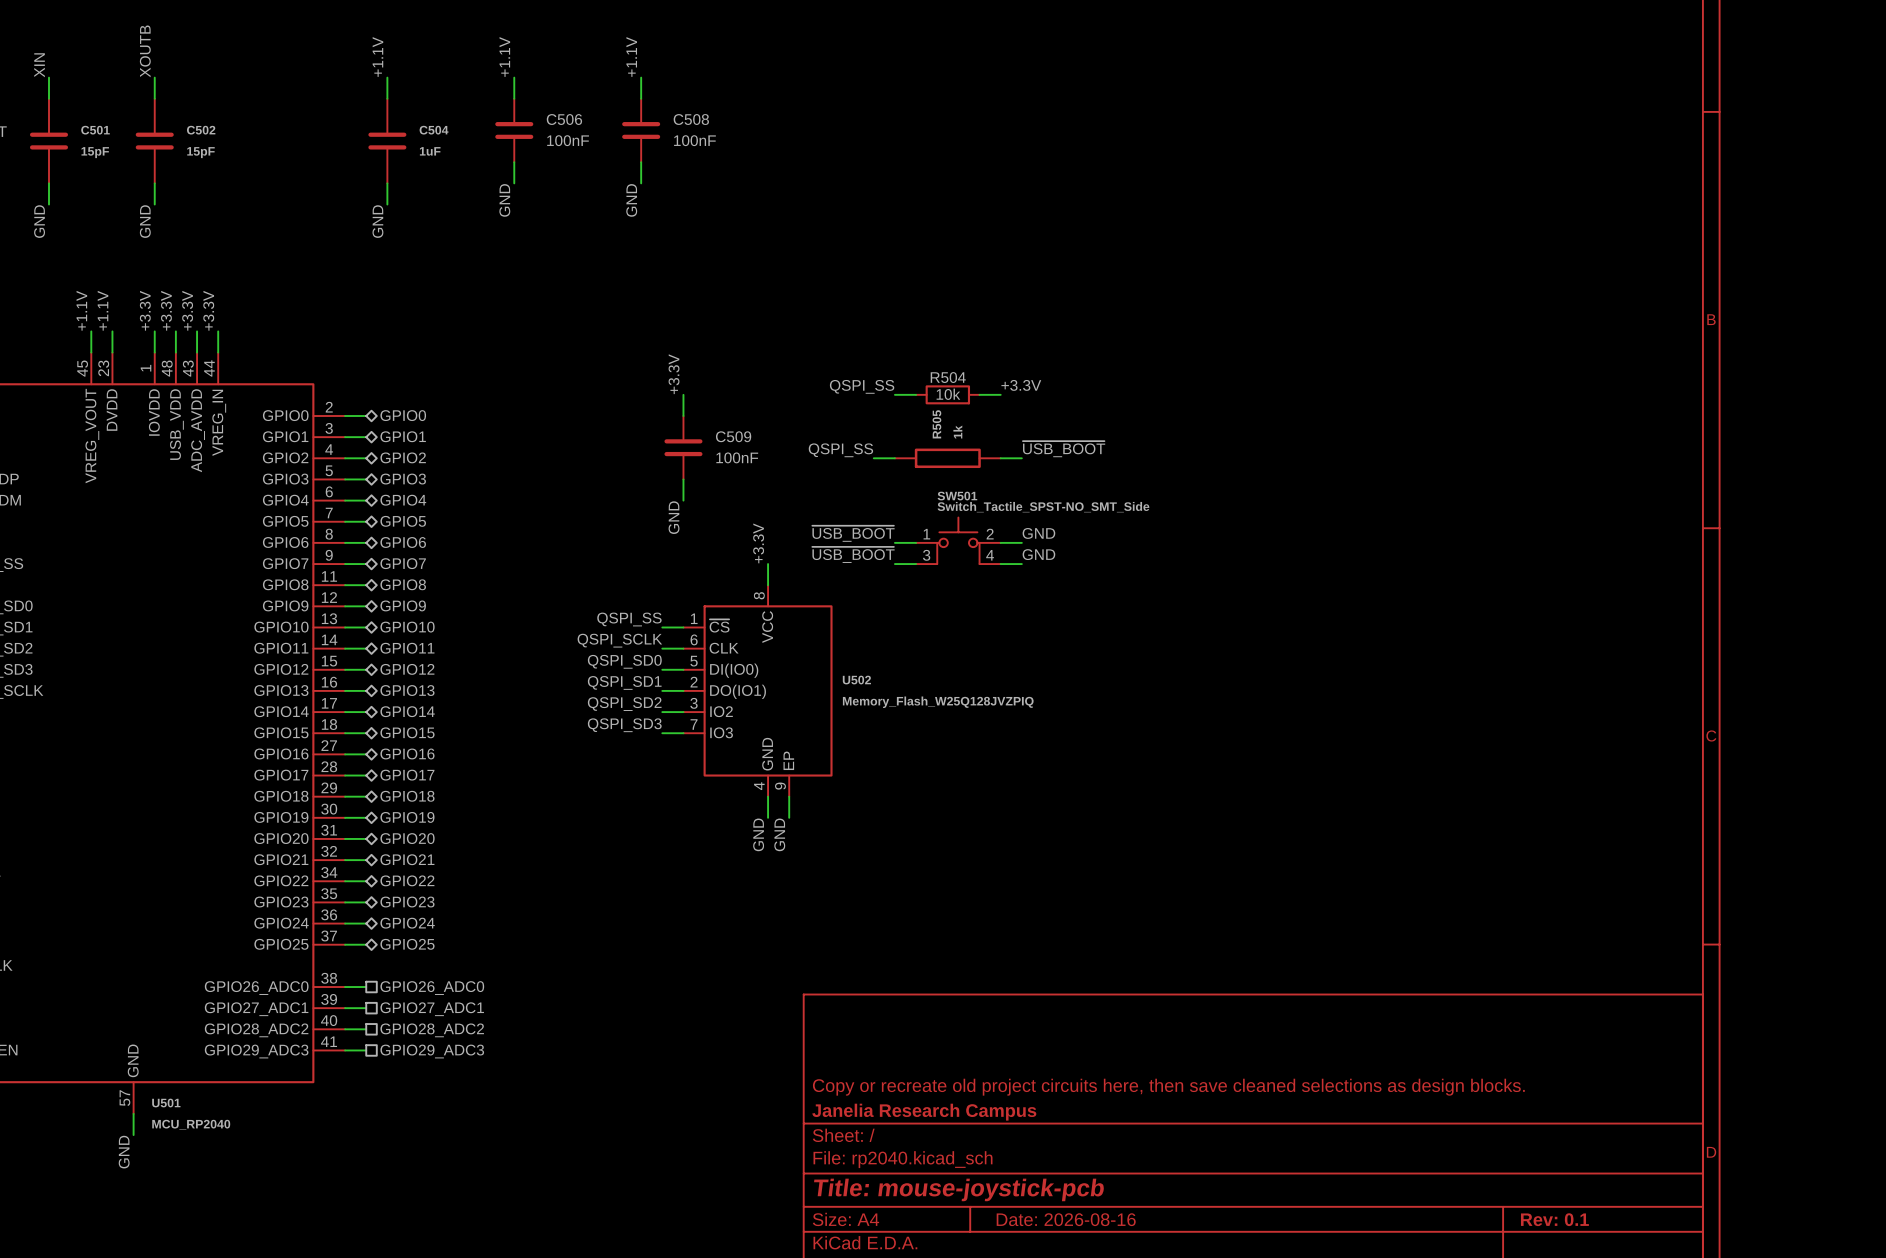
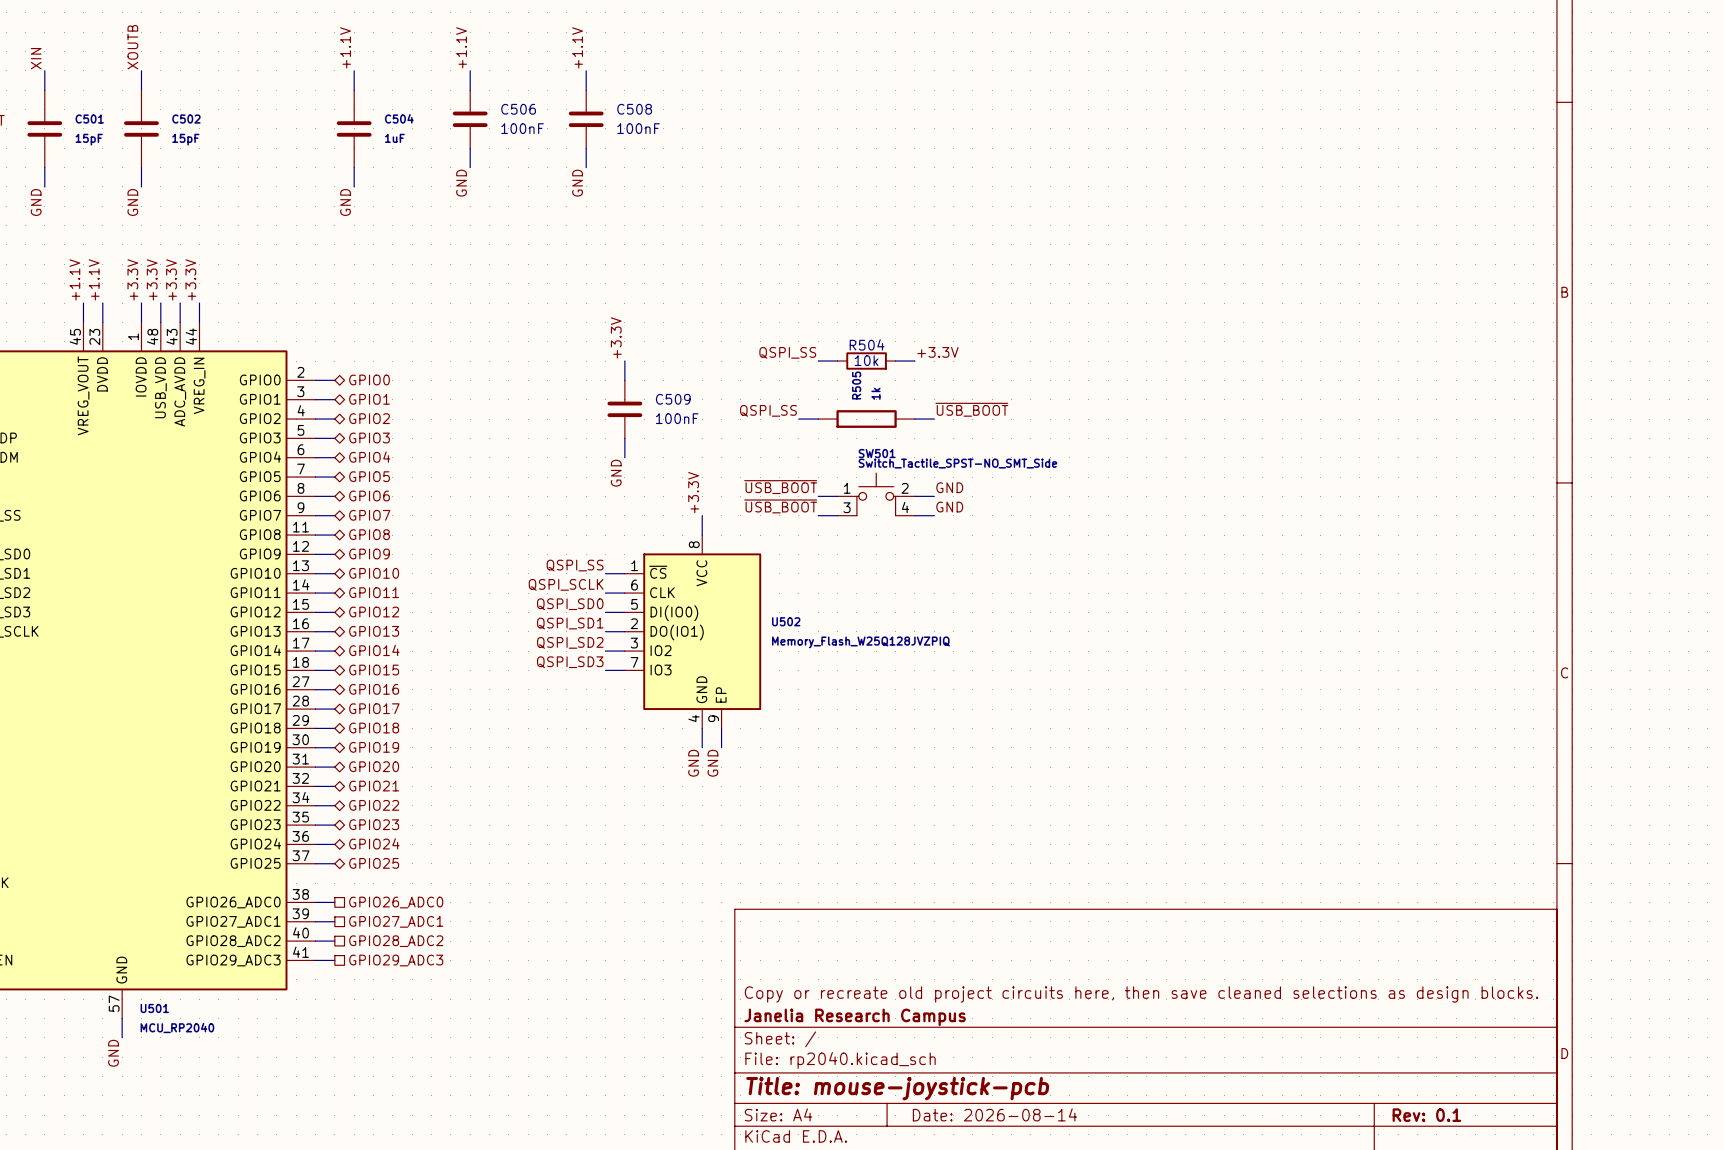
title block: Date: 2026-08-16 (1066, 1219) -> Date: 2026-08-14 (994, 1114)

